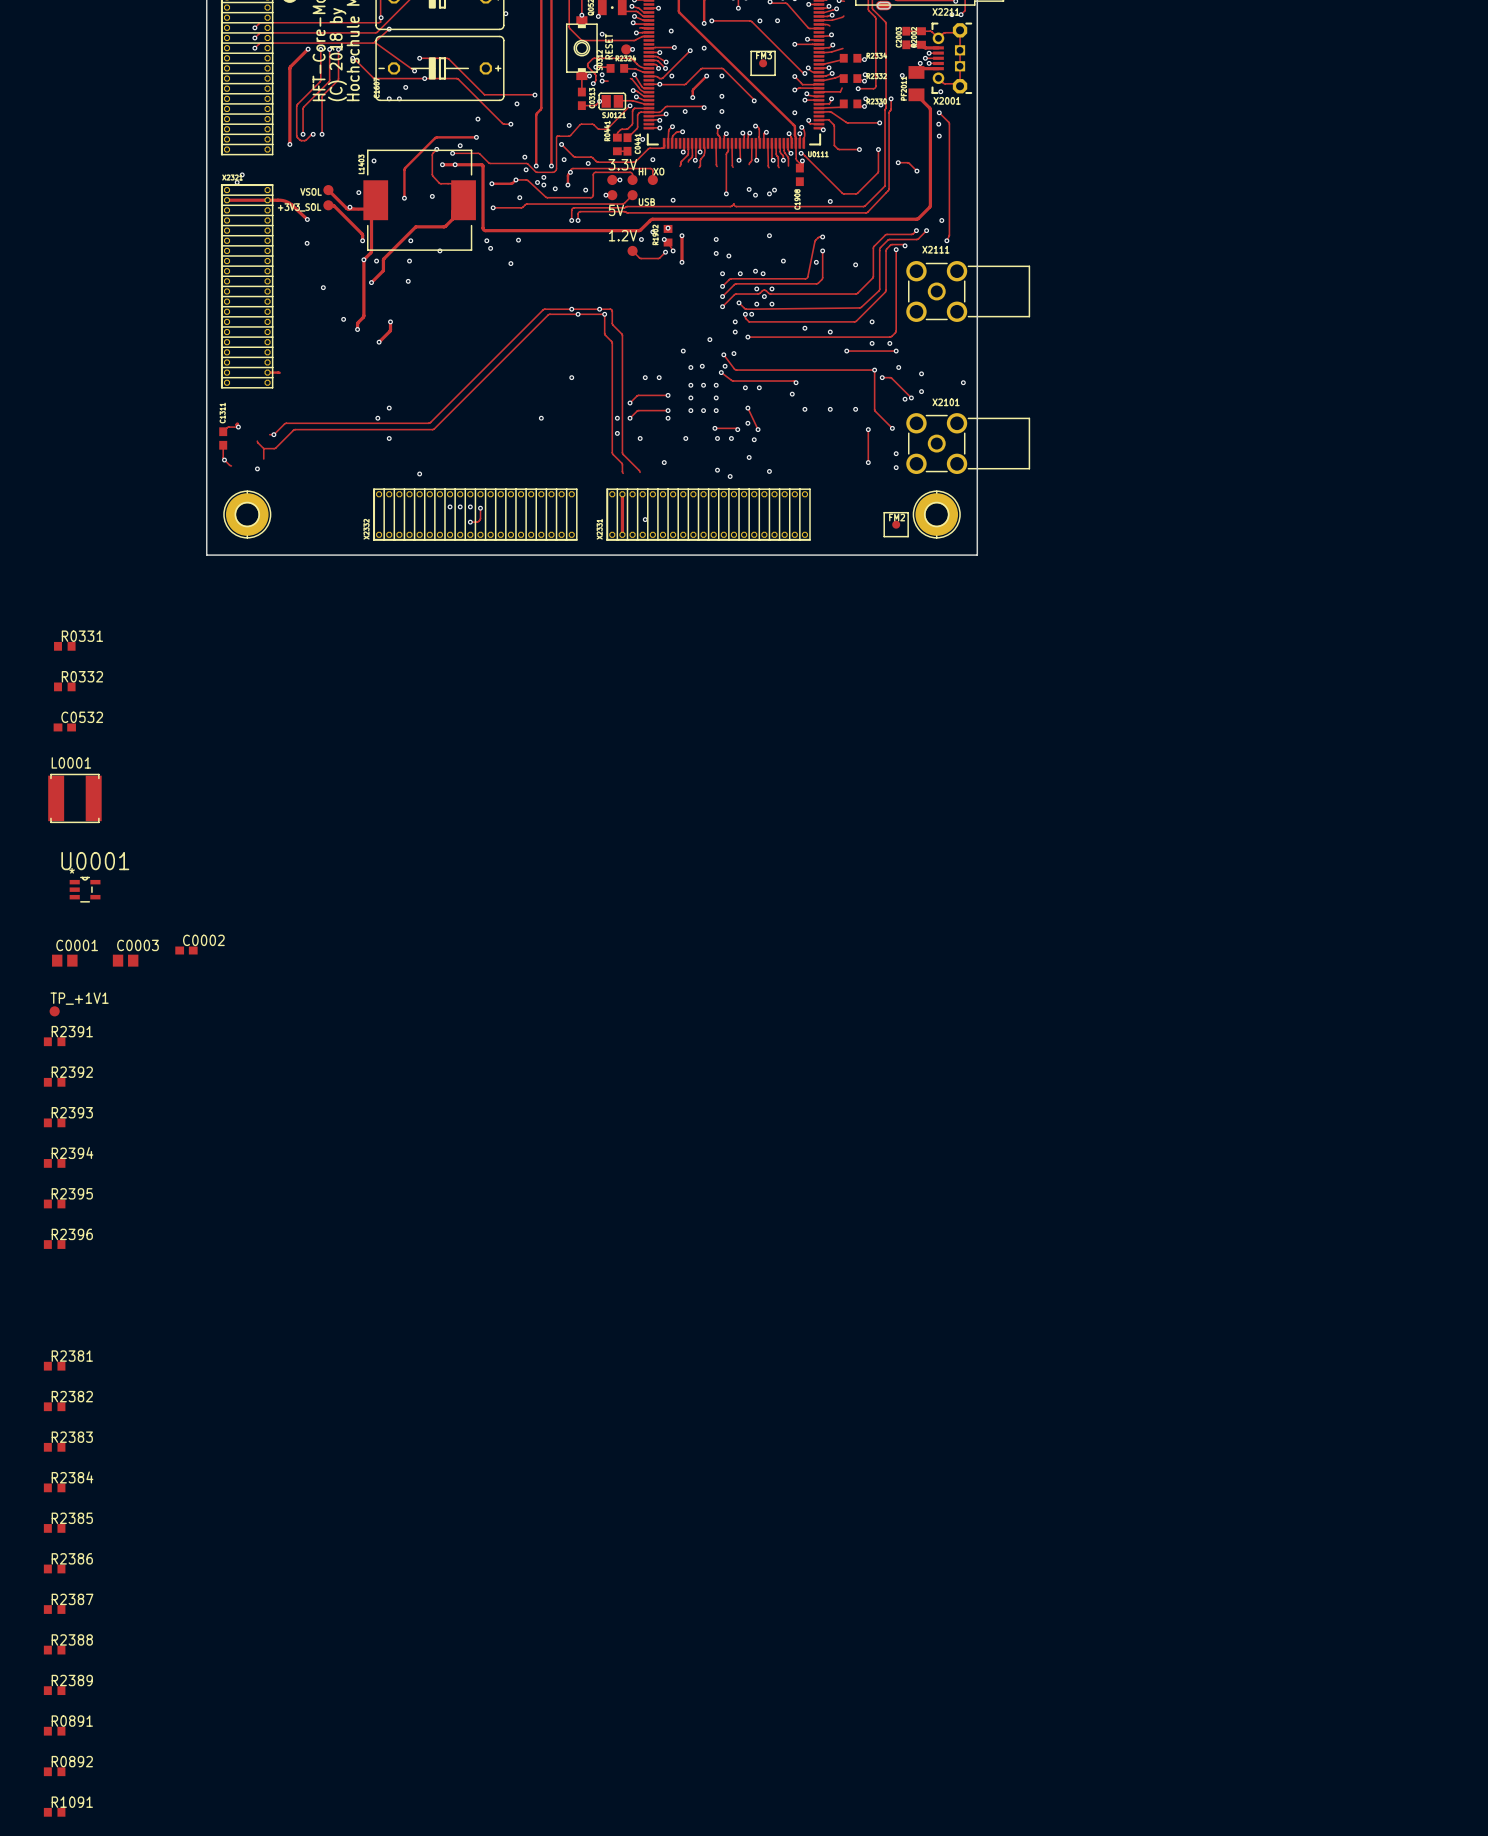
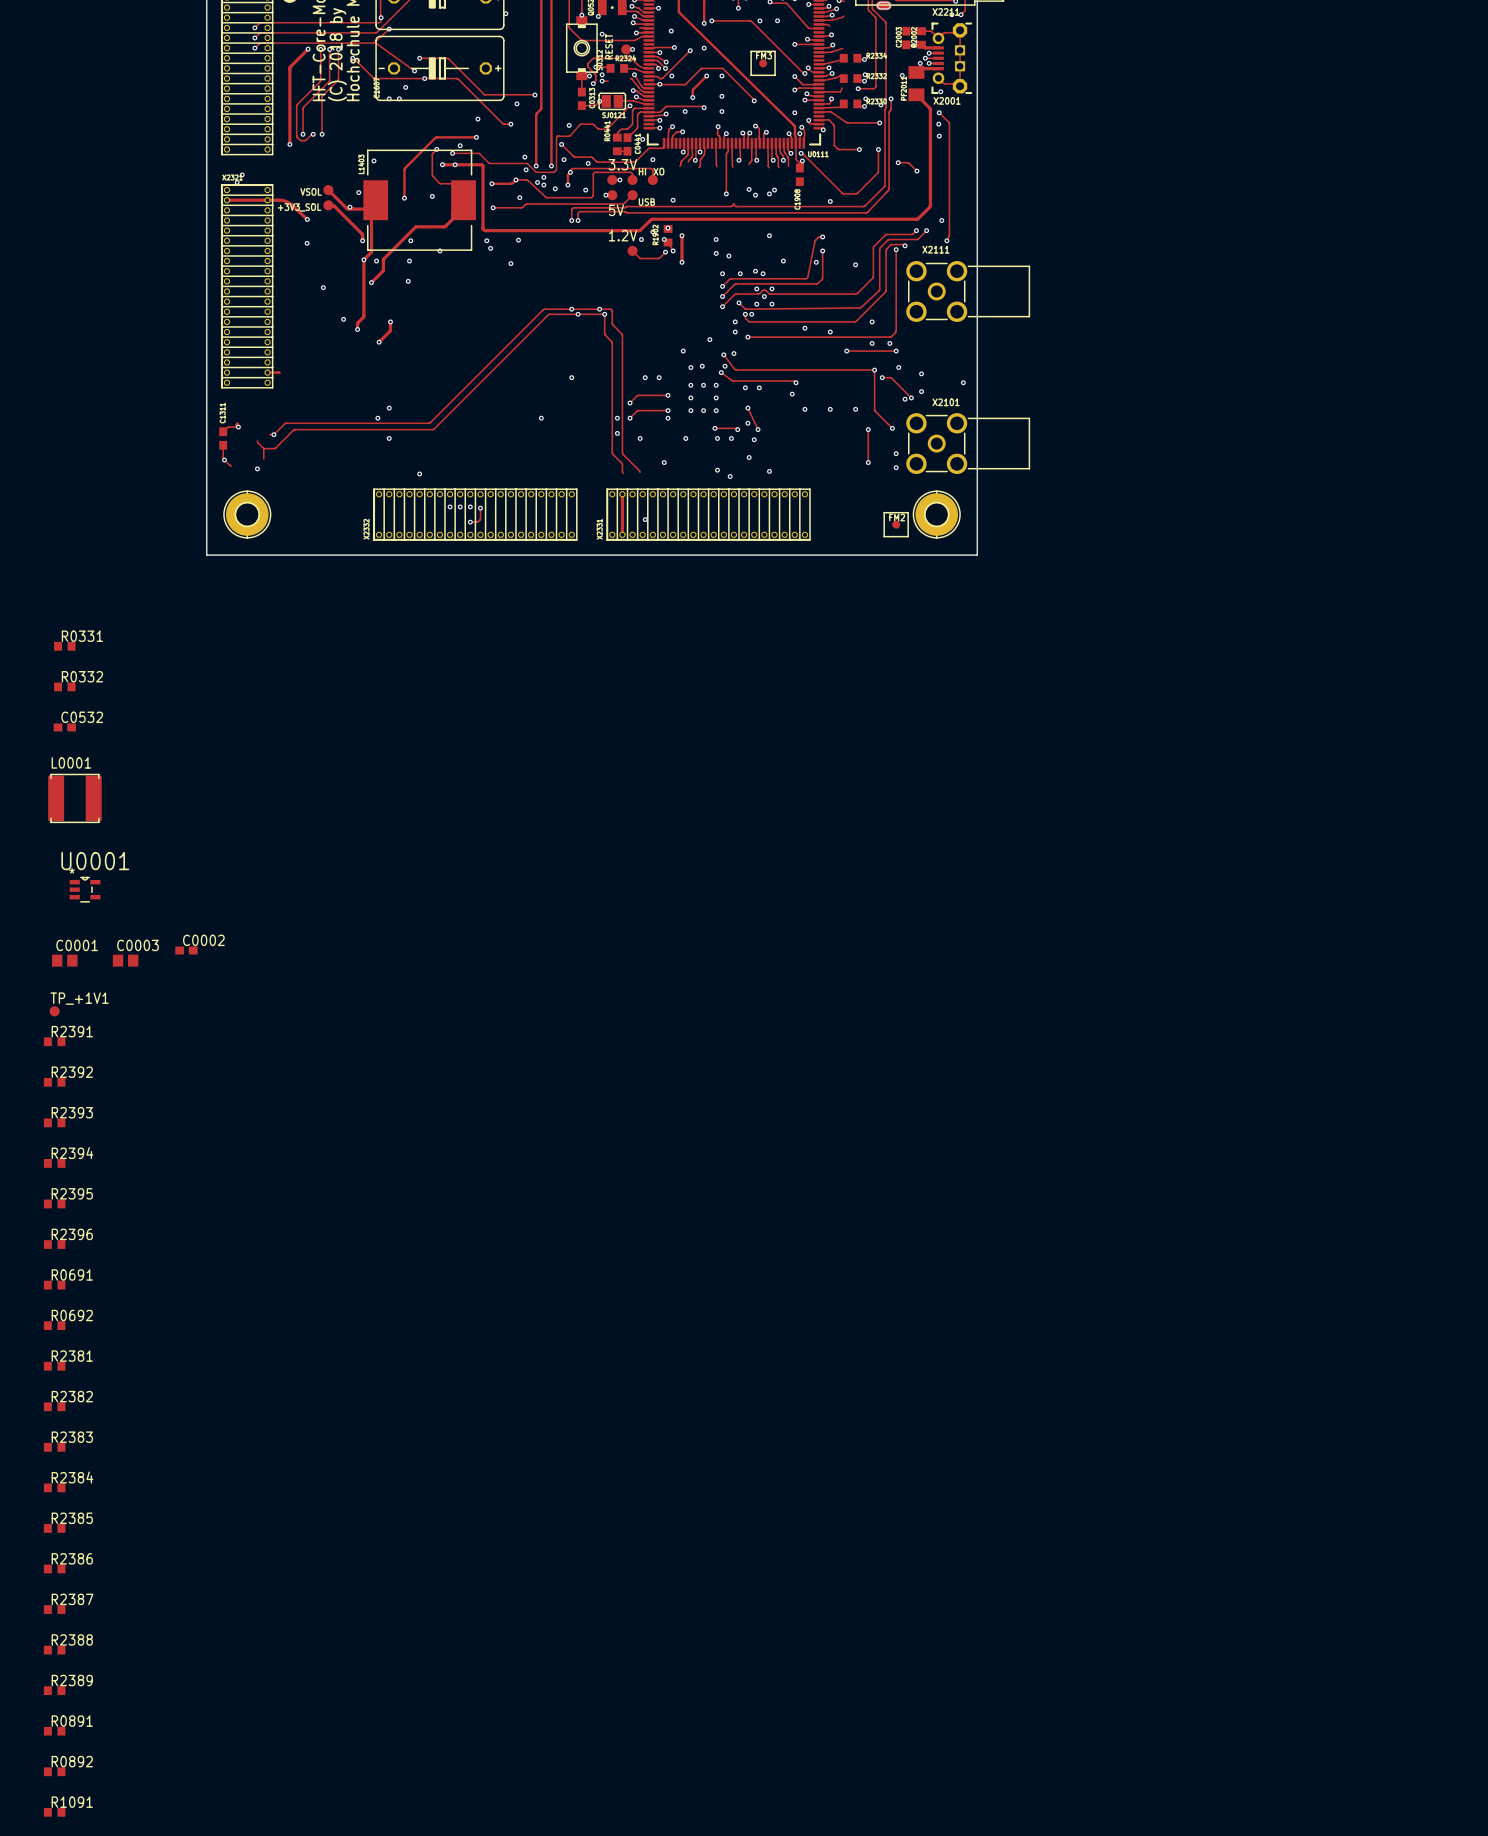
R0691: none -> (54, 1285)
R0692: none -> (54, 1325)

